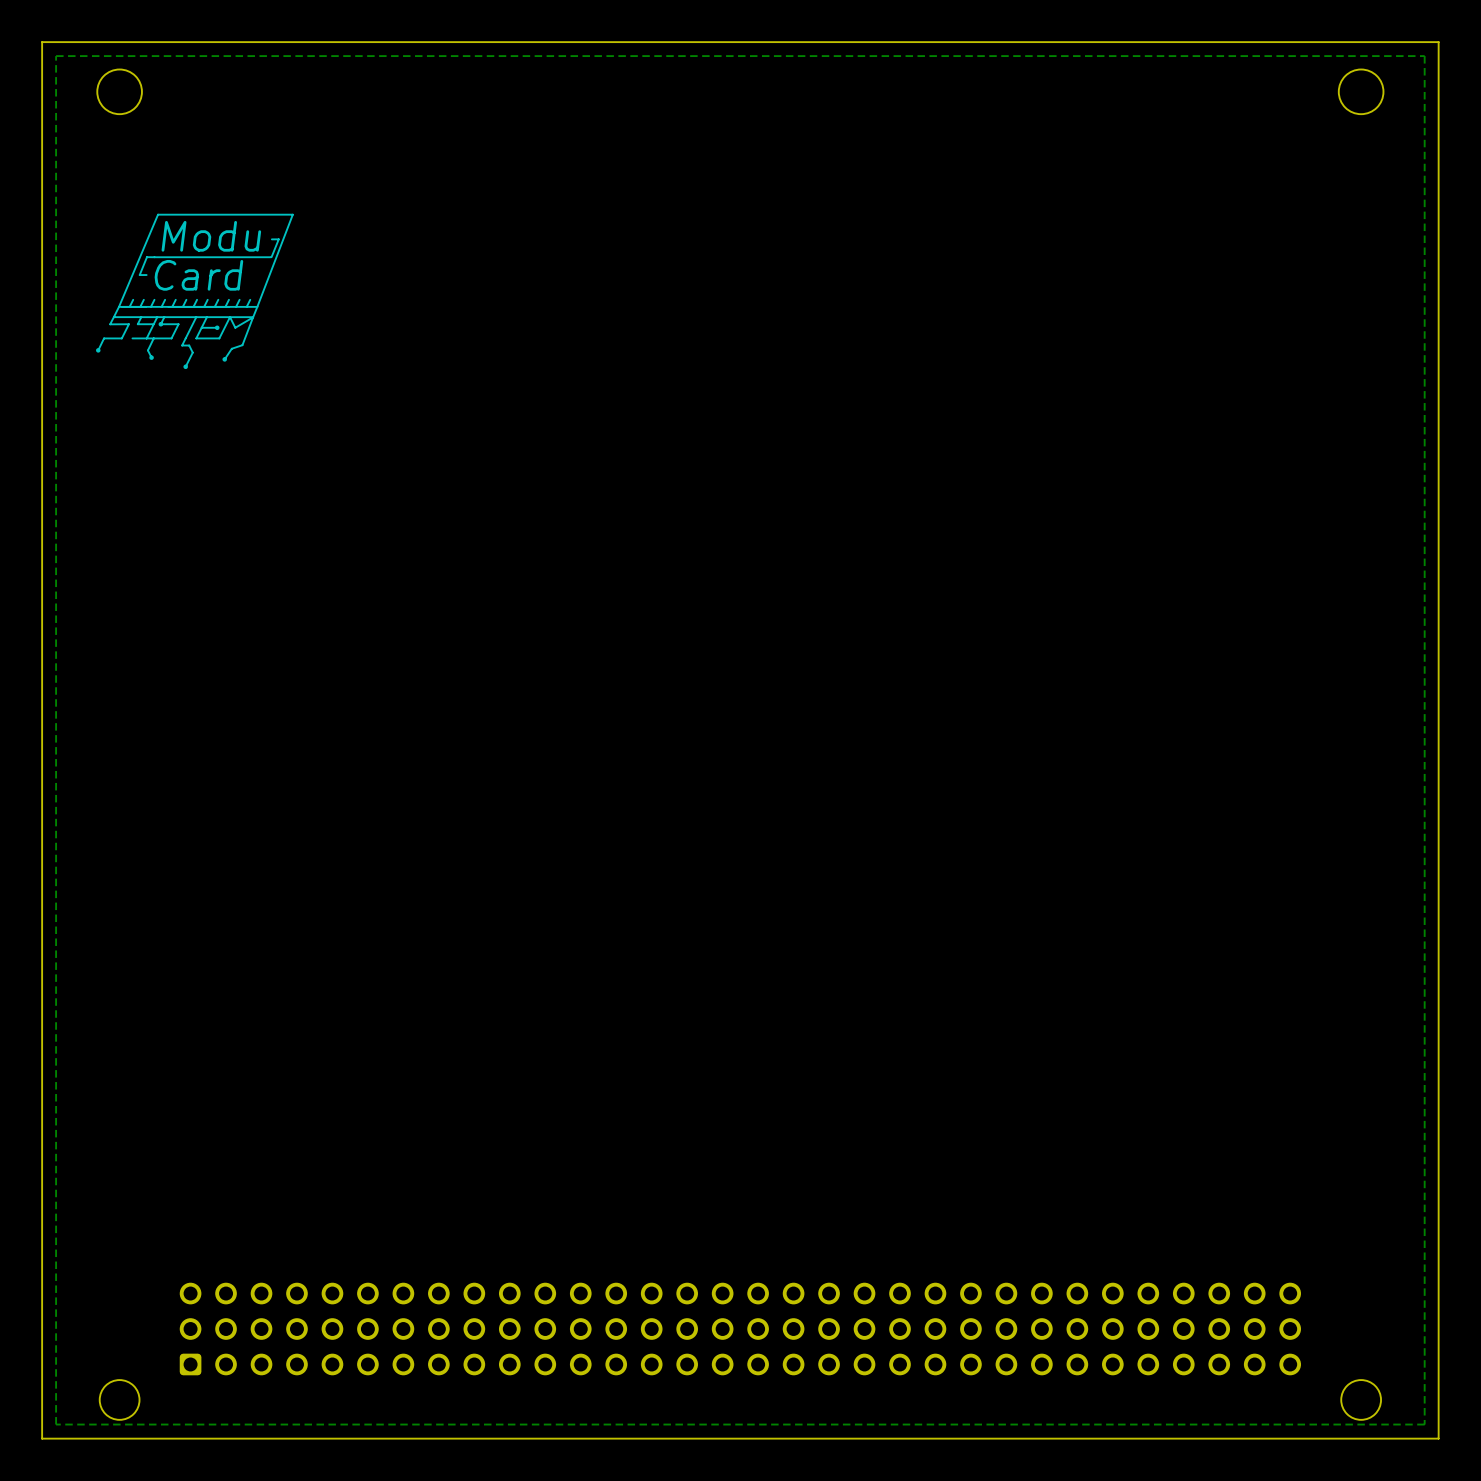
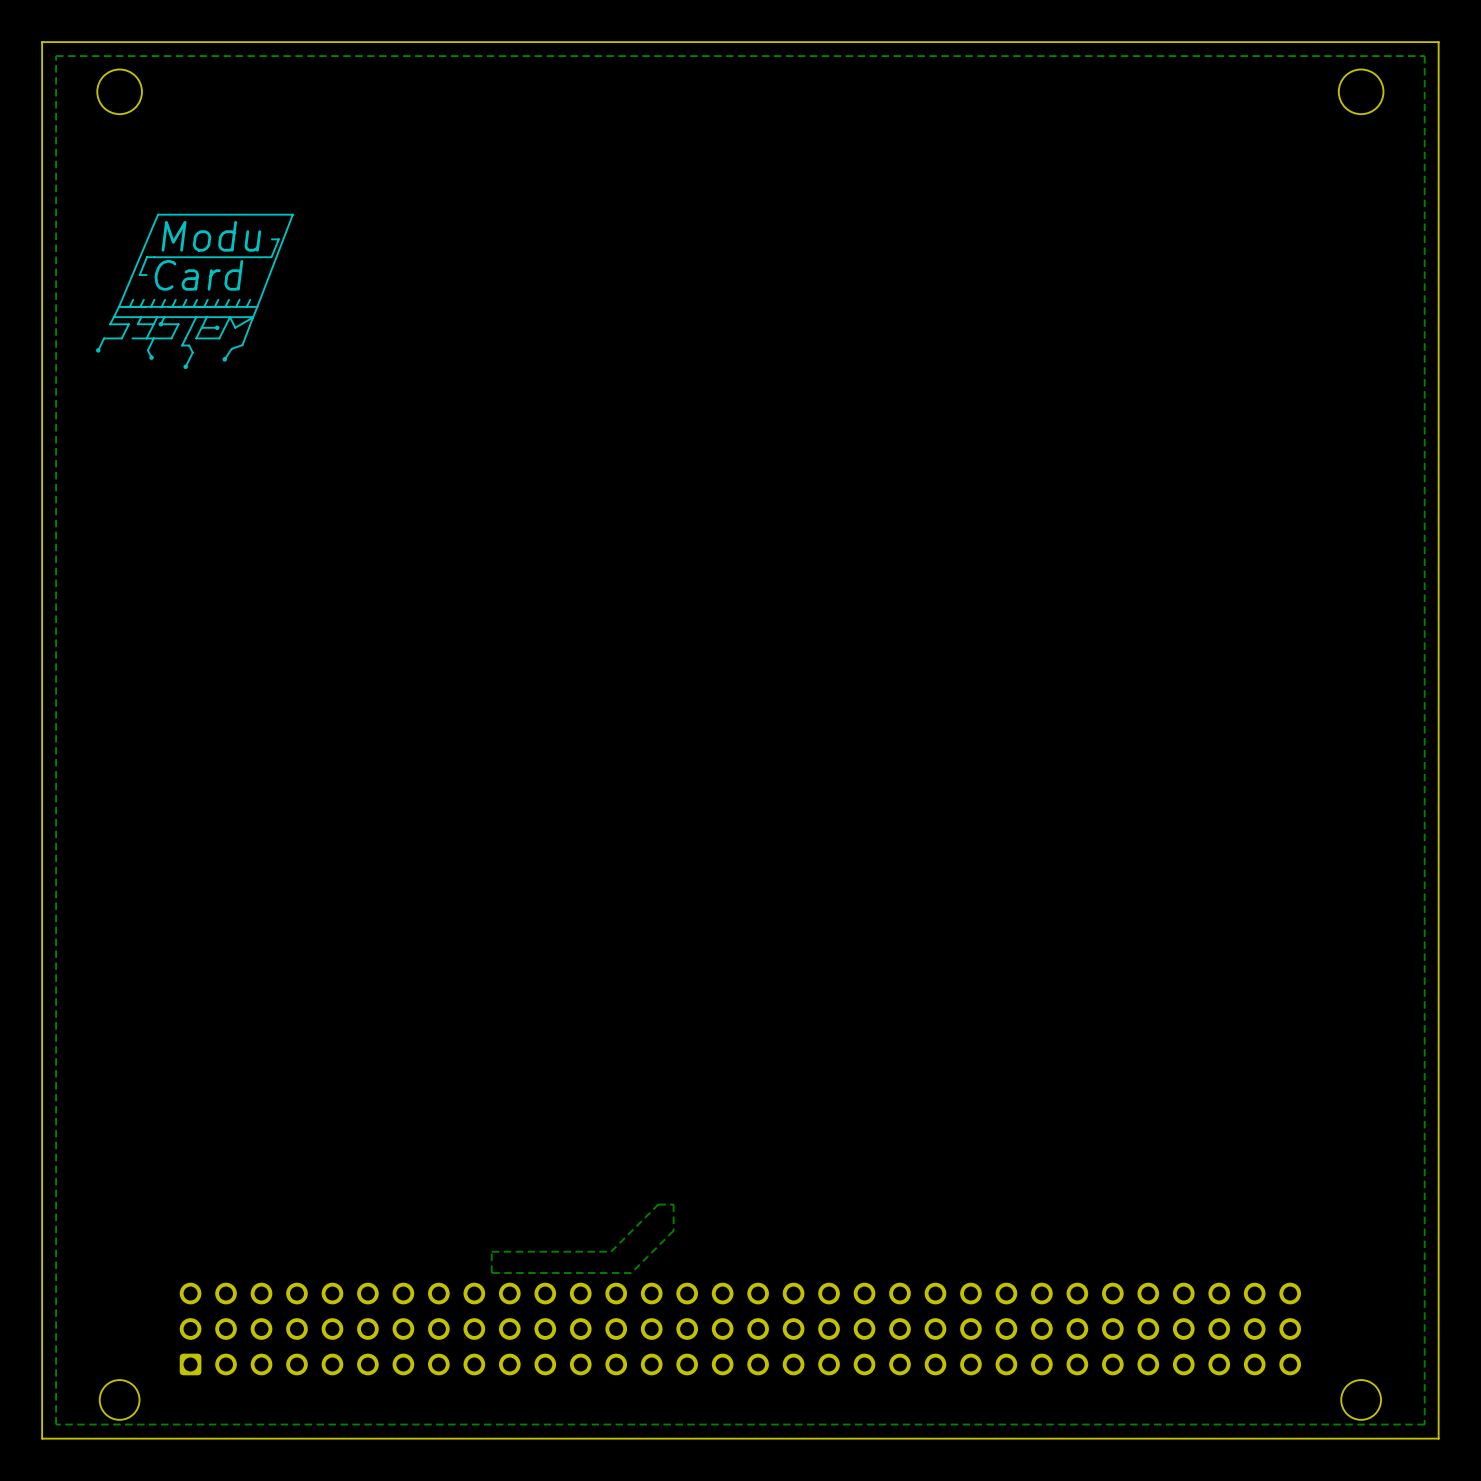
zone outline: none -> (673, 1204) (658, 1204) (611, 1251) (491, 1251) (491, 1273) (631, 1273) (673, 1230) (673, 1204)

